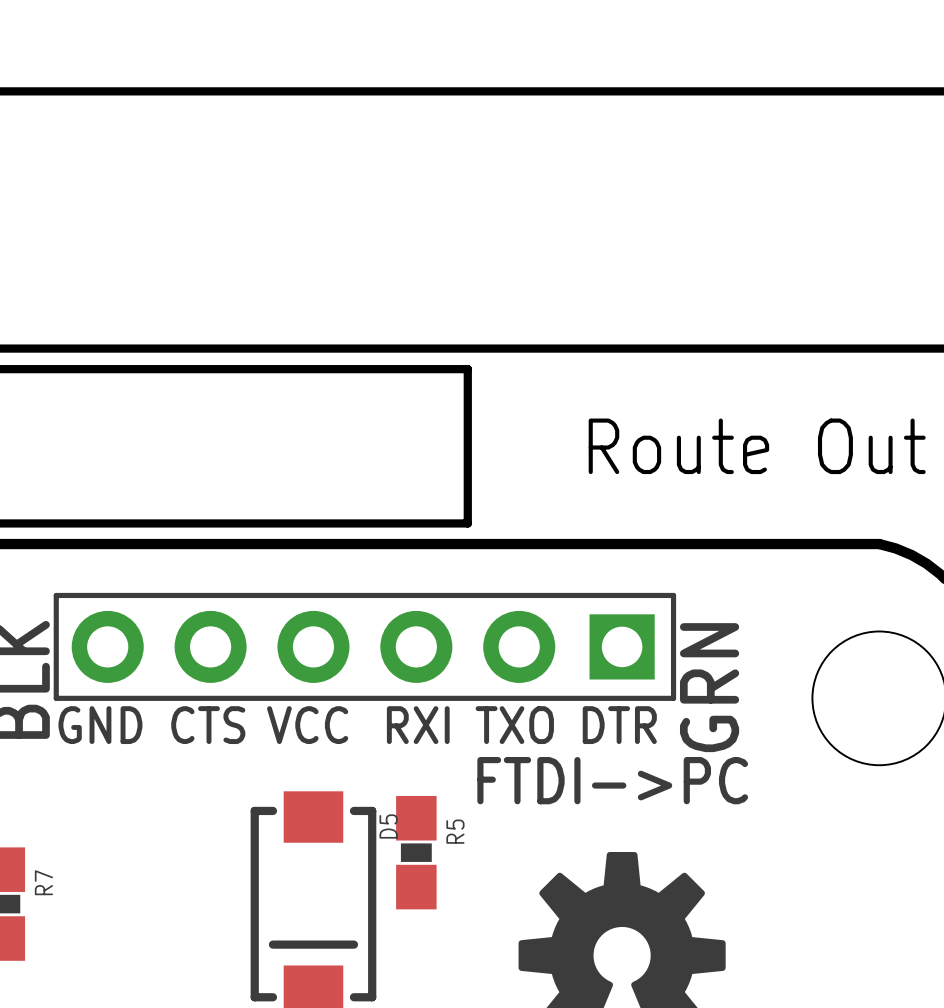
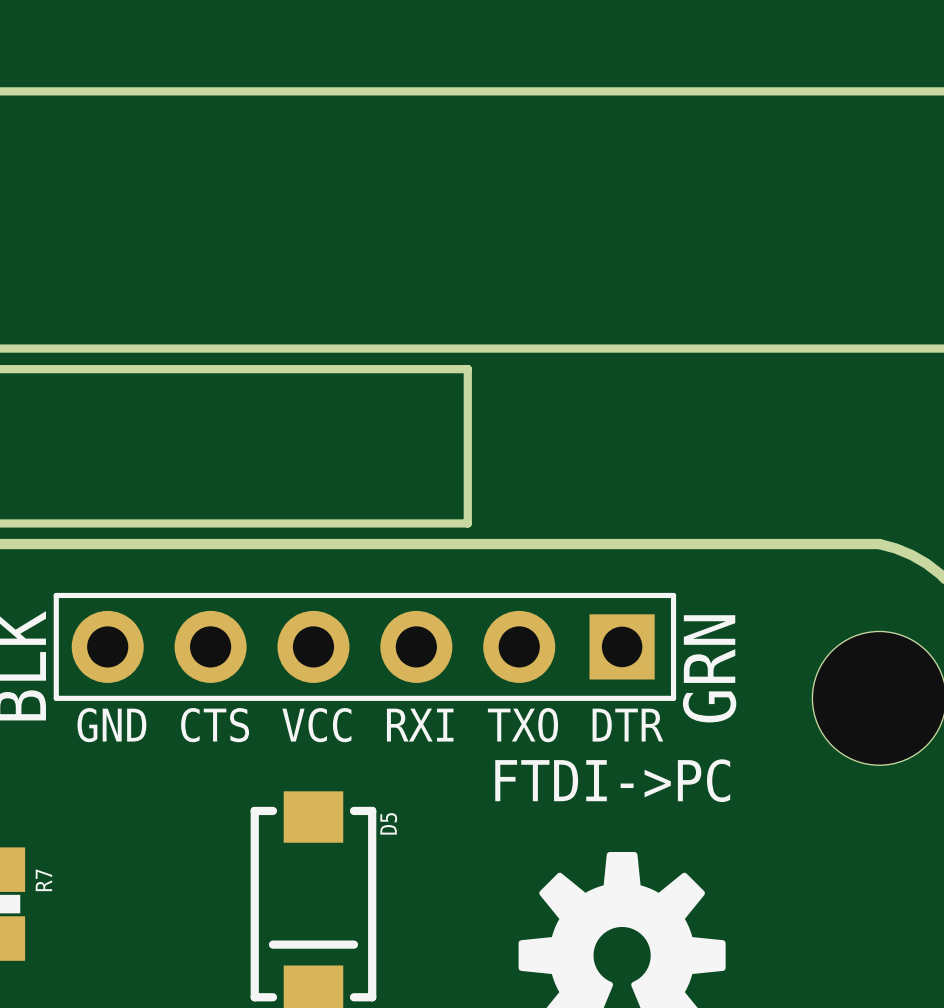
text: Route Out (757, 446) -> none
R5: (416, 852) -> none

